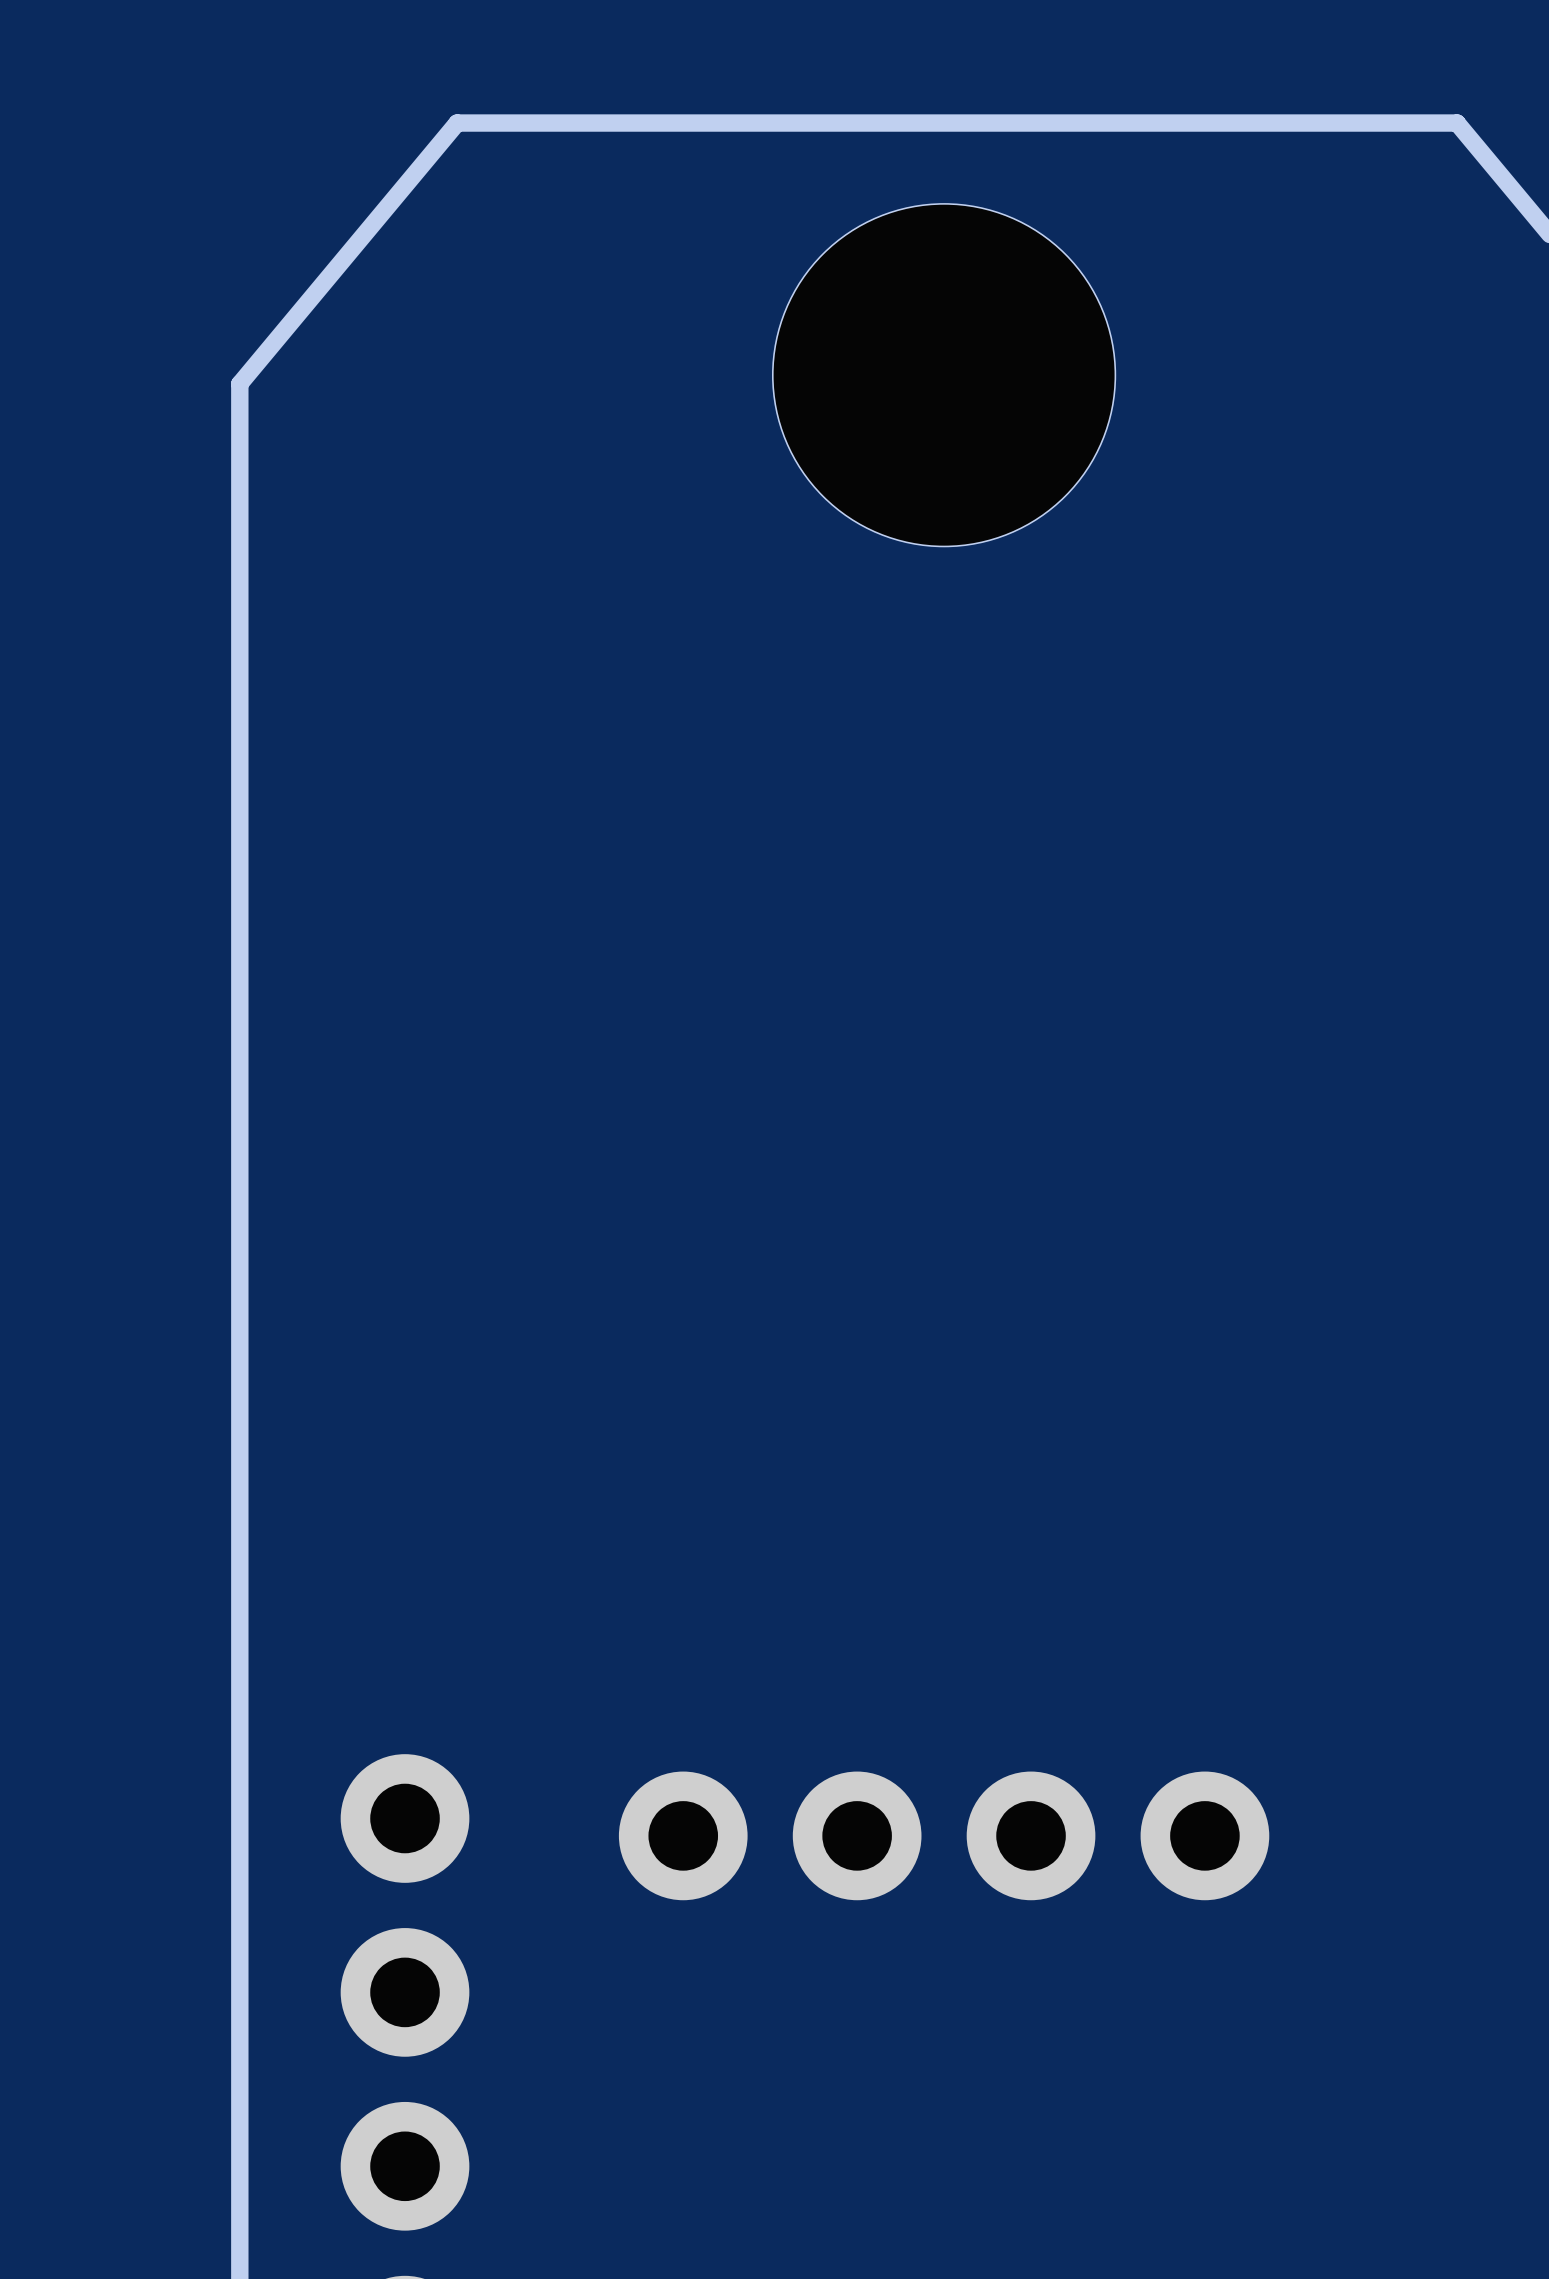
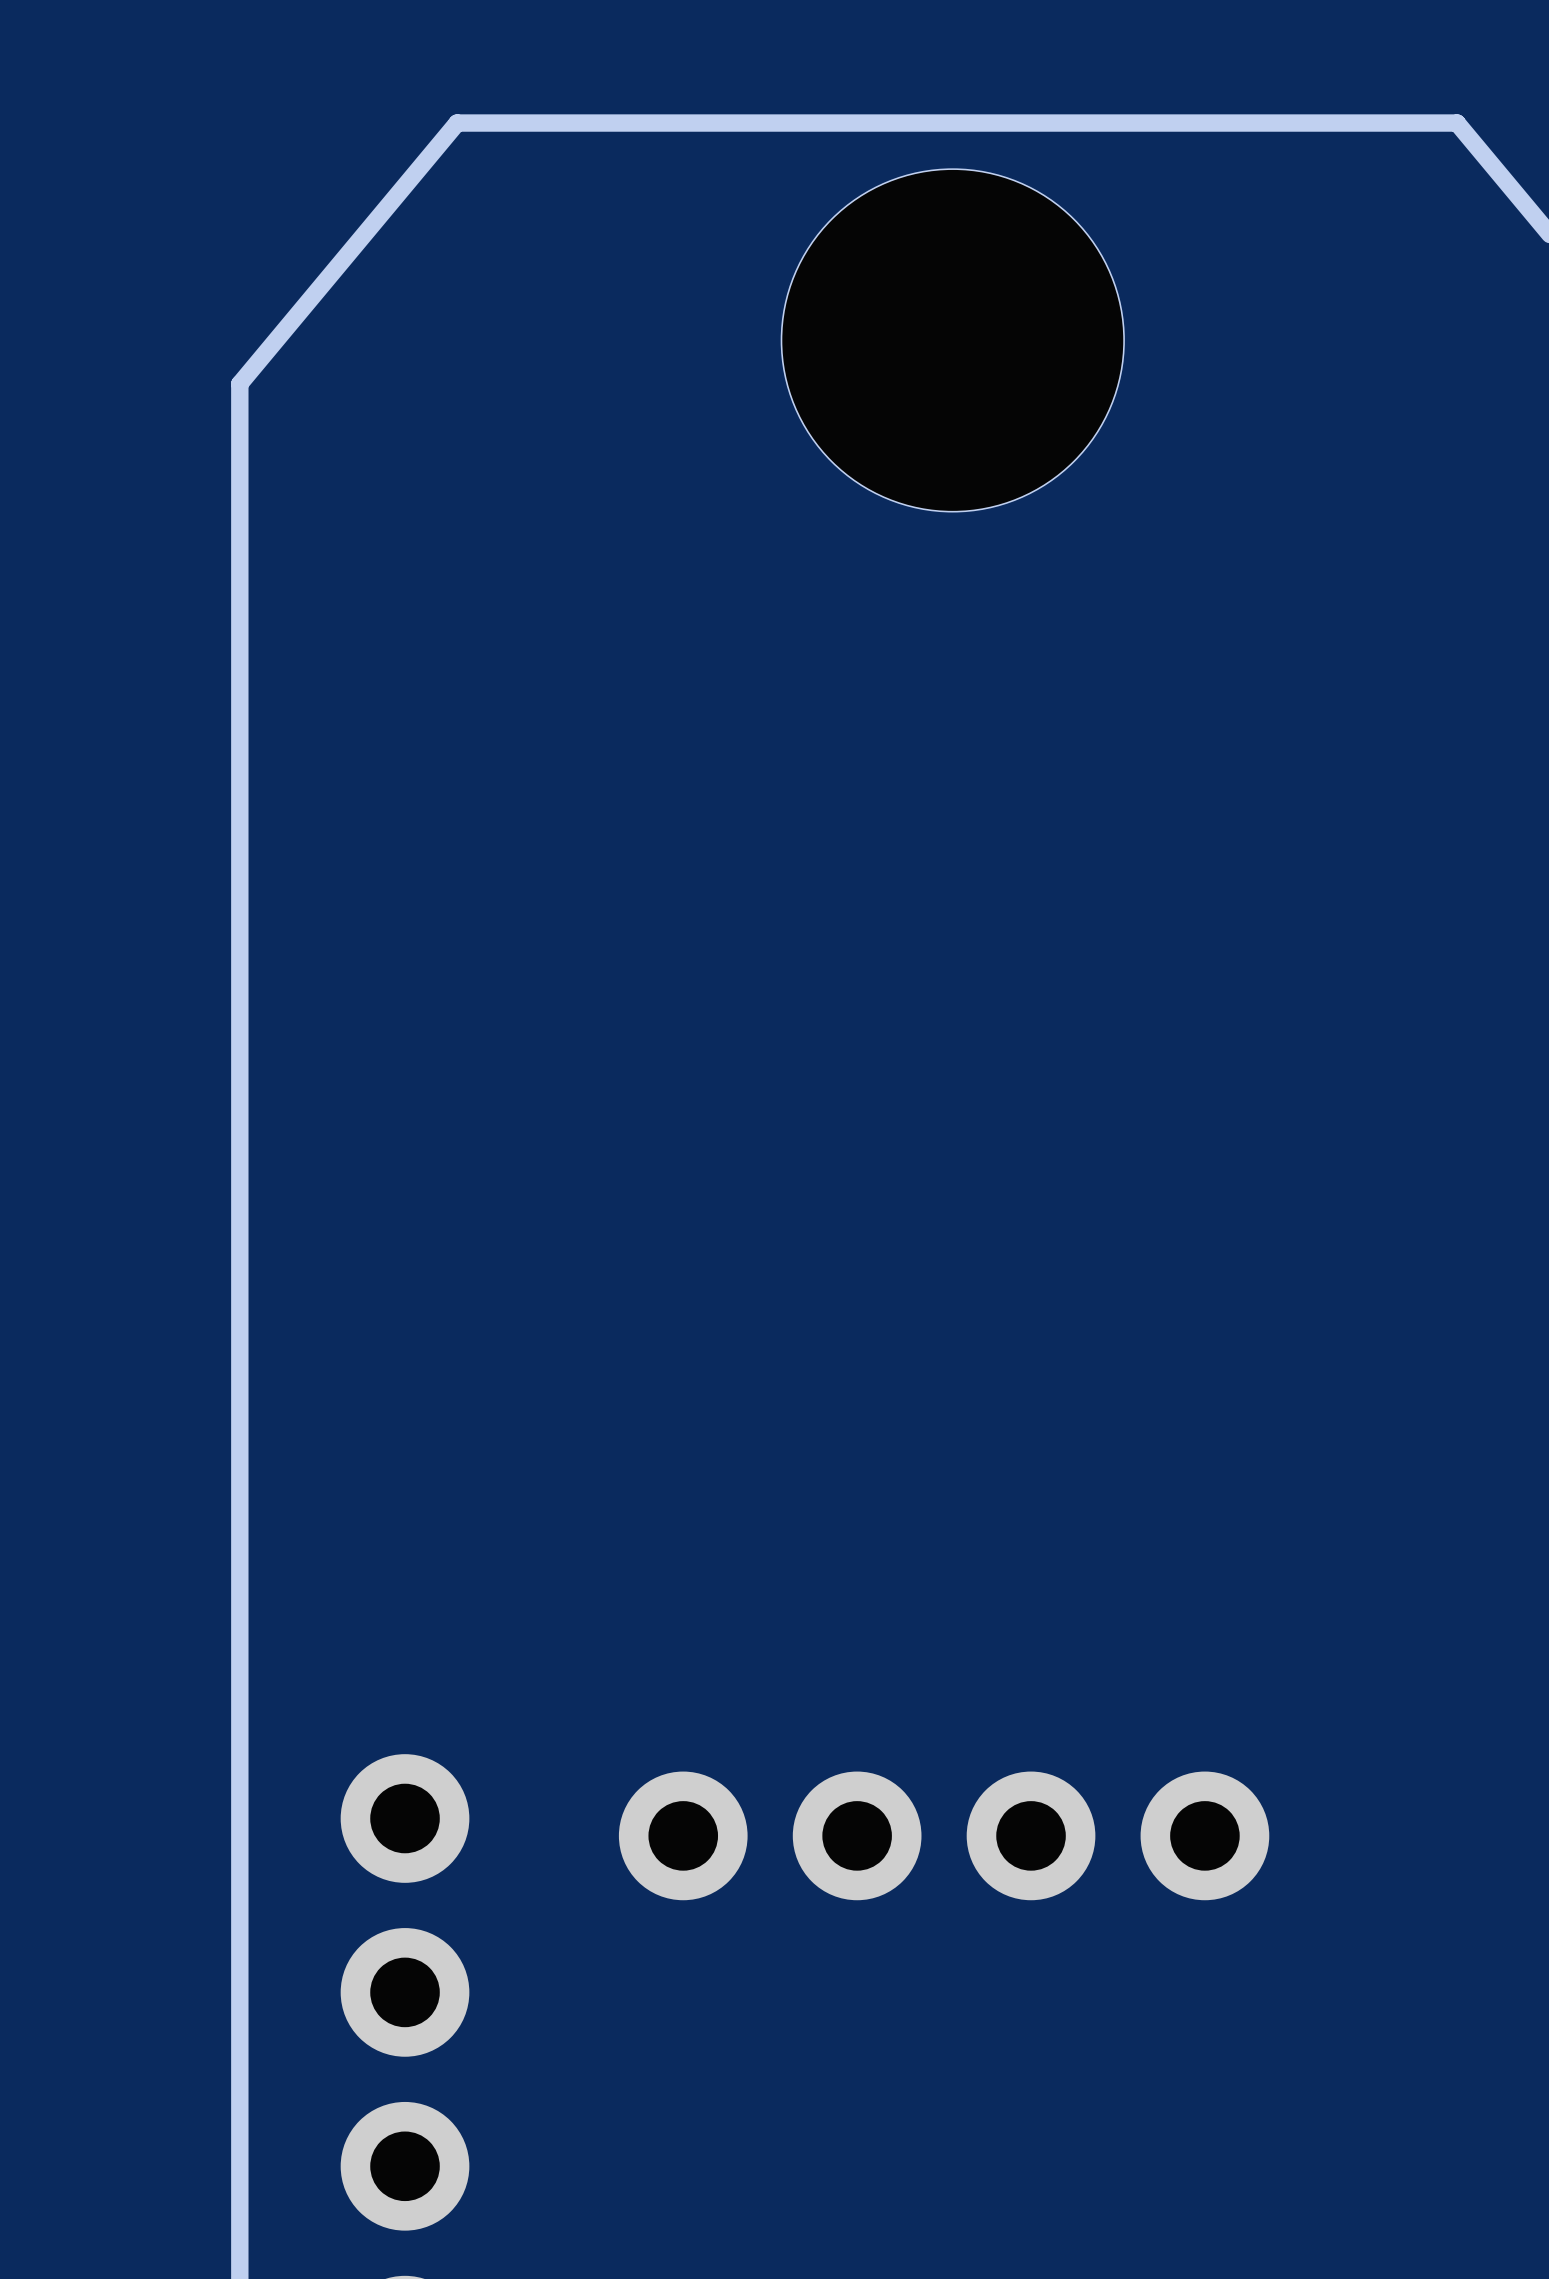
hole position: (944, 375) -> (952, 340)

